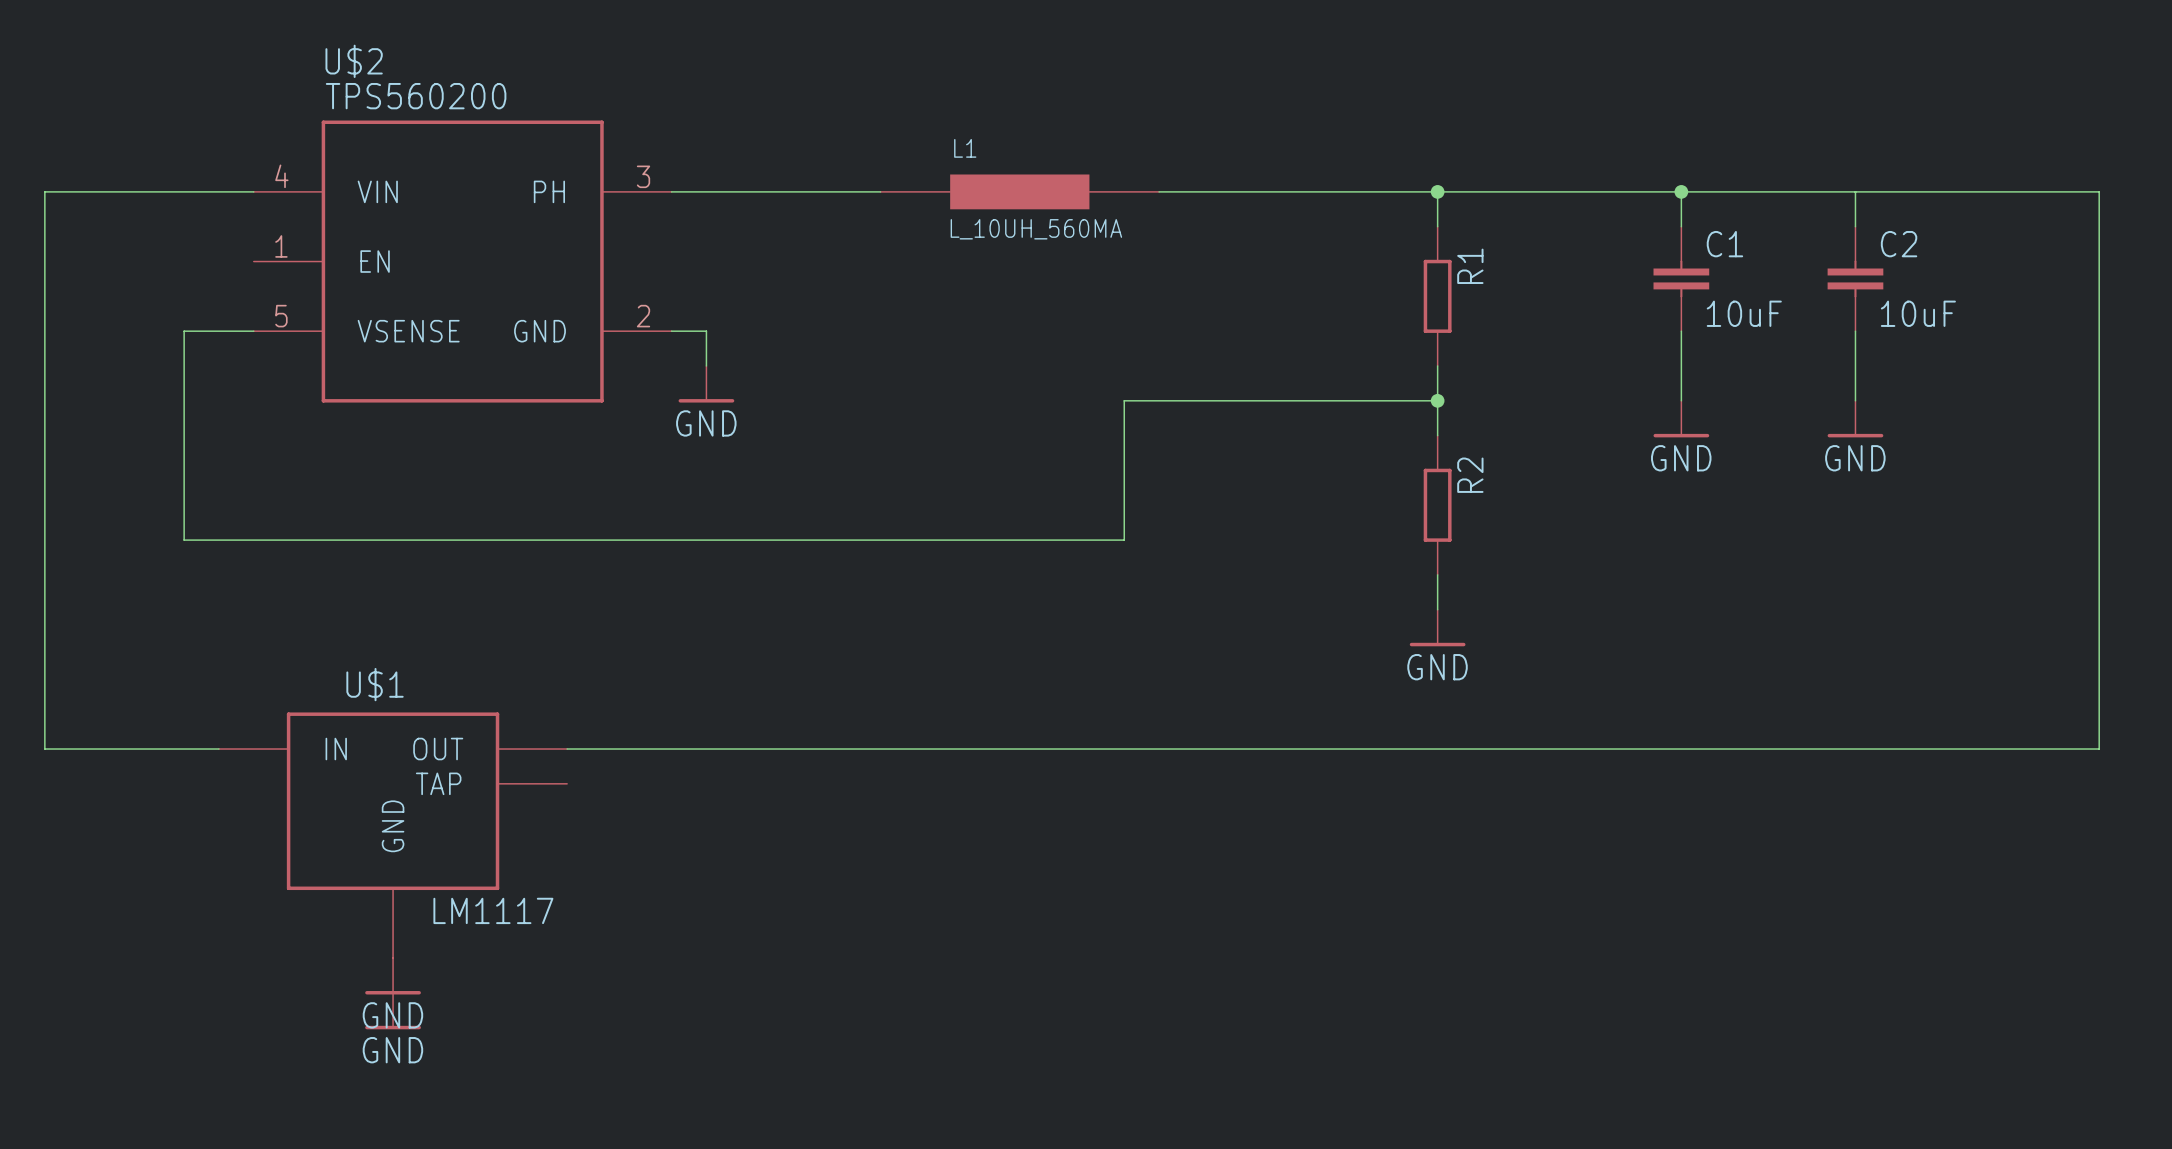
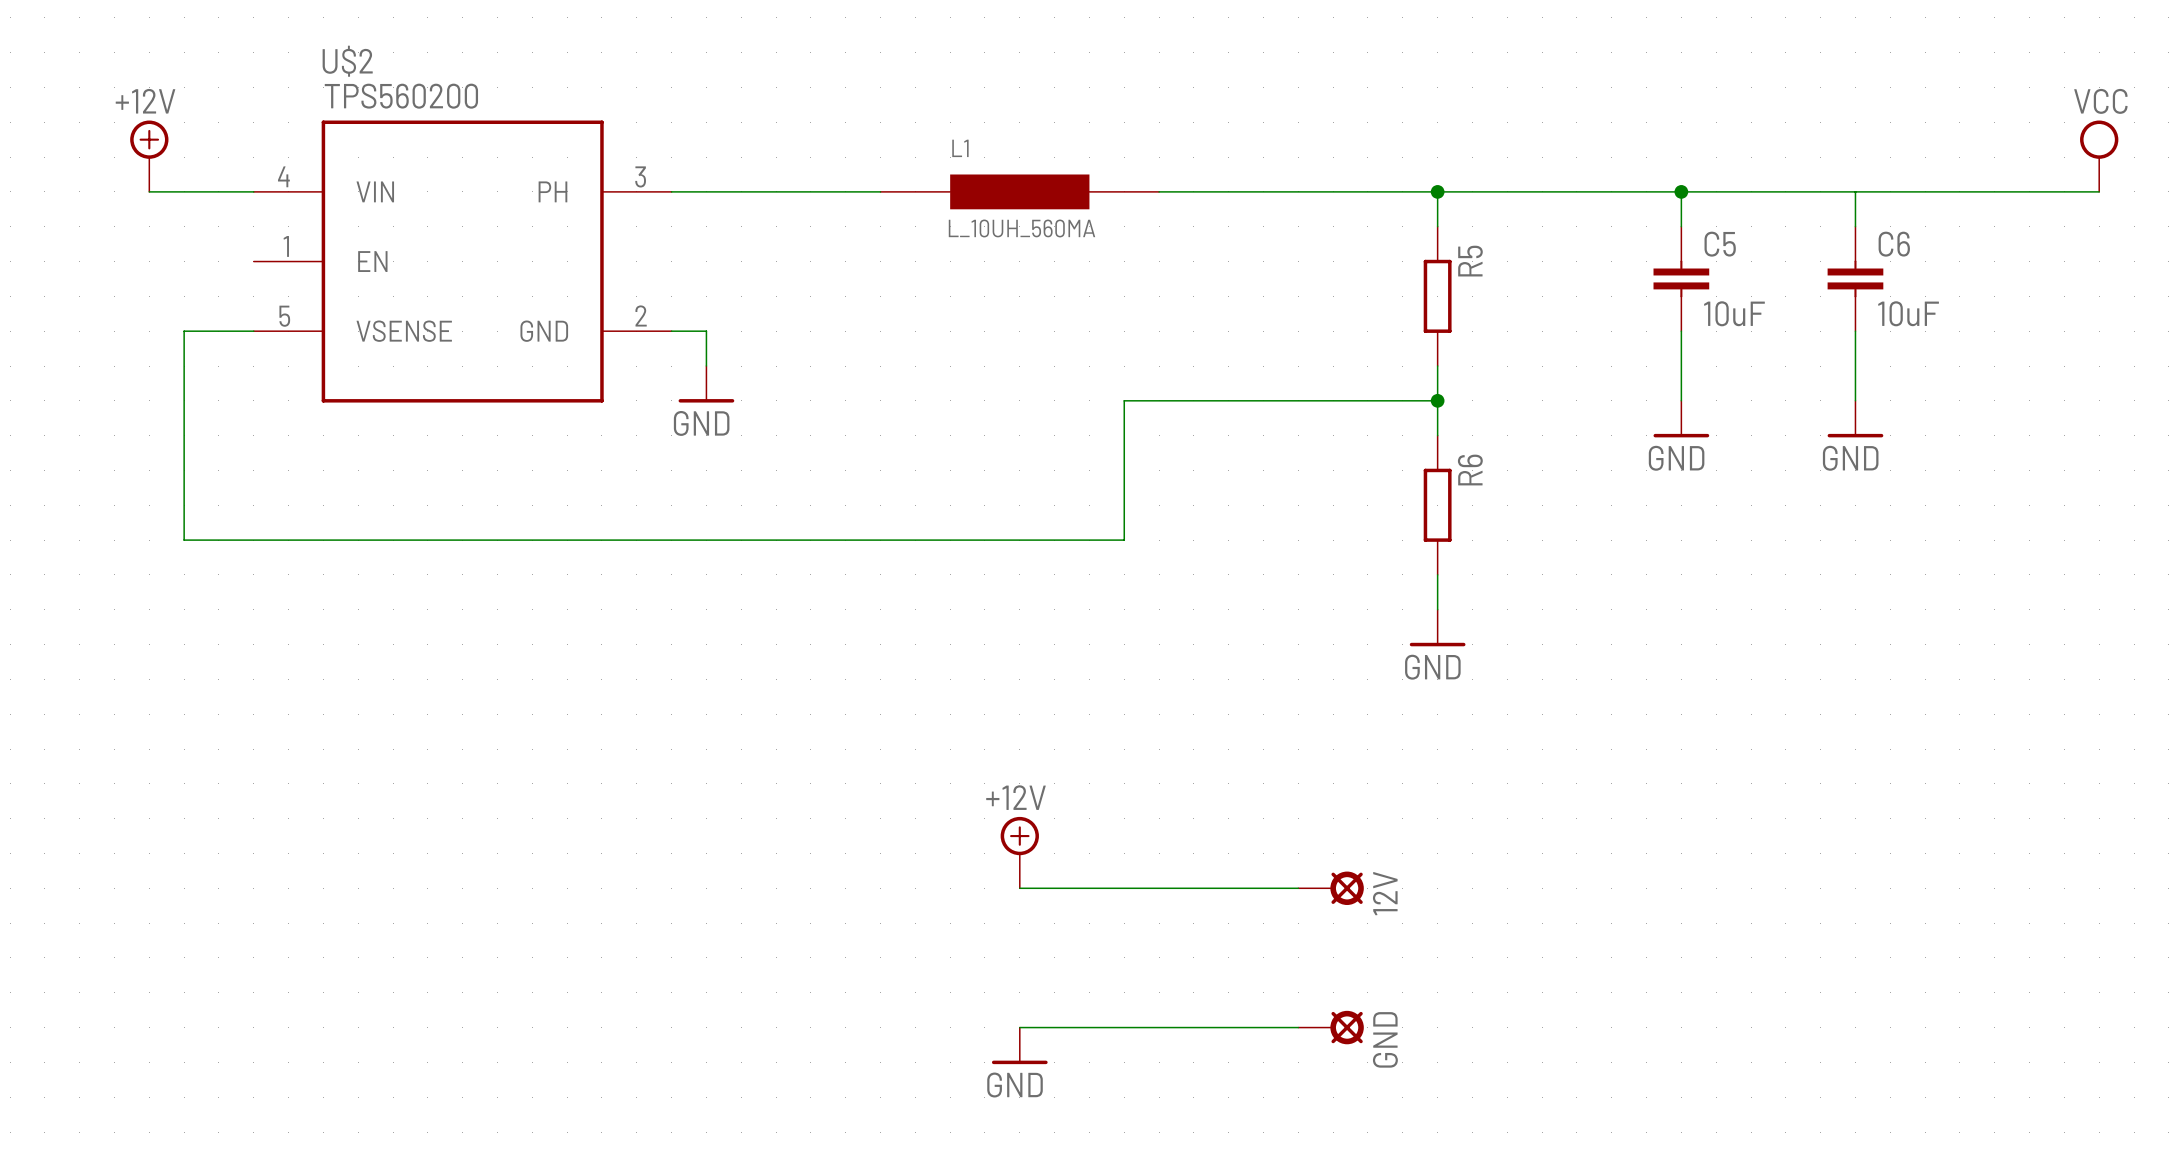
power symbol: none -> +12V (149, 156)
power symbol: none -> VCC (2099, 156)
wire: (149, 191) (44, 191) (44, 749) (218, 749) -> none
wire: (2099, 191) (2099, 749) (567, 749) -> none
C1 name: C1 (1724, 244) -> C5 (1720, 244)
C2 name: C2 (1899, 244) -> C6 (1894, 244)
R1 name: R1 (1470, 266) -> R5 (1470, 261)
R2 name: R2 (1470, 475) -> R6 (1470, 470)
U$1: LM1117 (393, 835) -> none
power symbol: none -> +12V (1019, 852)
wire: none -> (1019, 888) (1298, 888)
12V: none -> (1331, 888)
power symbol: GND (393, 976) -> none
power symbol: GND (393, 1011) -> none
wire: none -> (1019, 1027) (1298, 1027)
GND: none -> (1331, 1027)
power symbol: none -> GND (1019, 1045)

